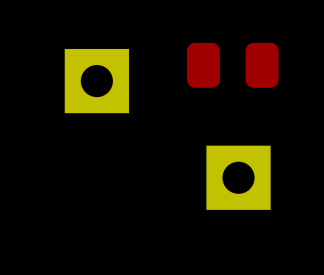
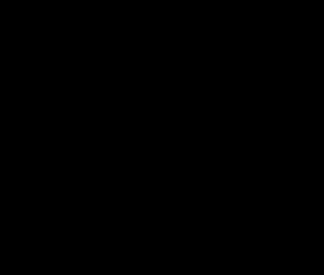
part: (232, 65) -> none
part: (96, 81) -> none
part: (238, 177) -> none

